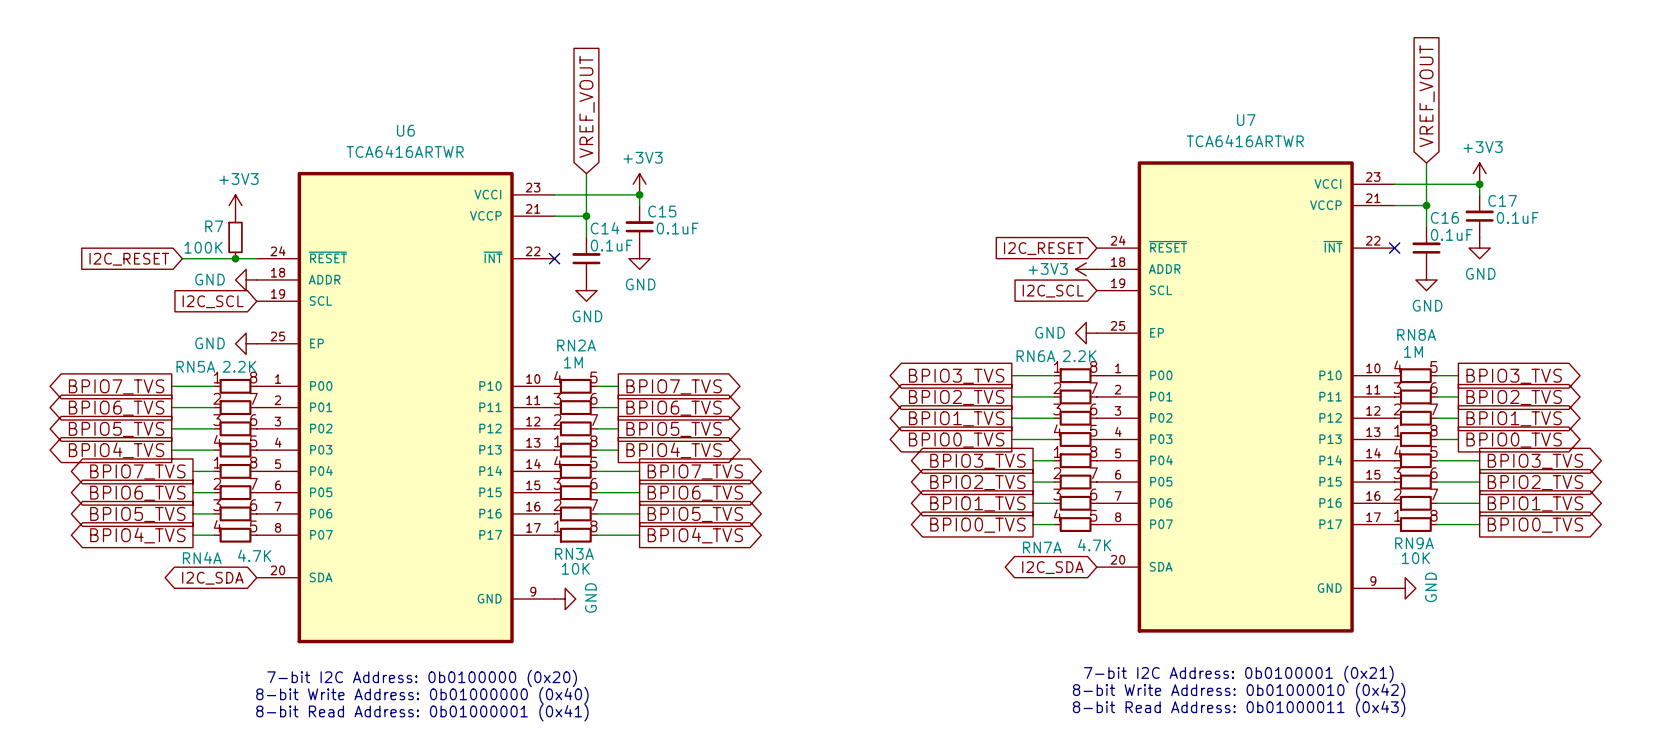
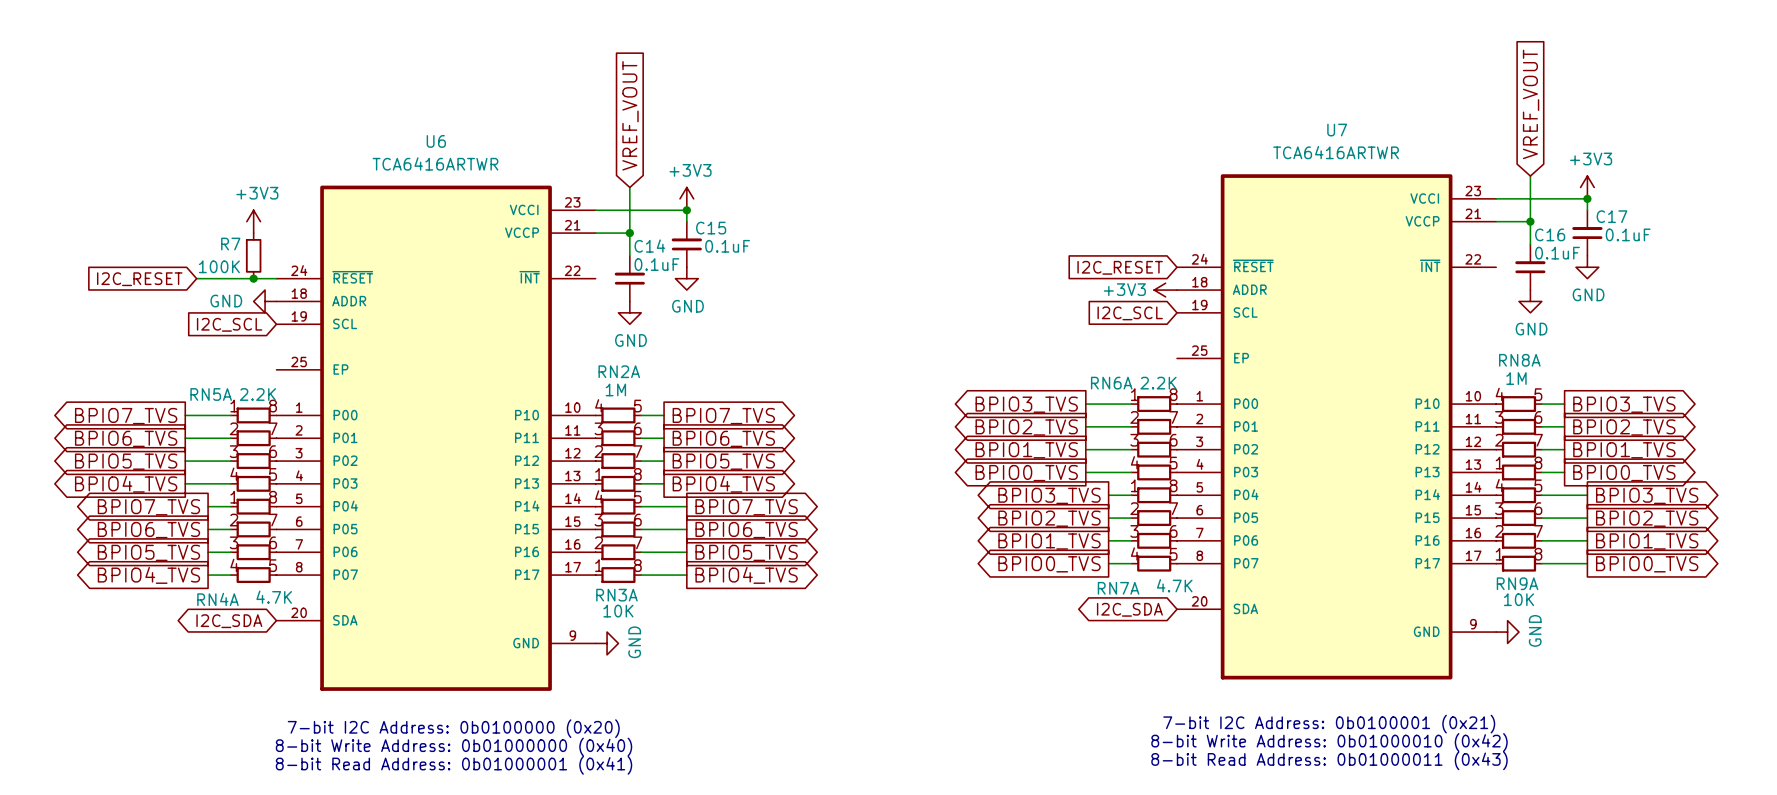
no-connect mark: (1394, 248) -> none
no-connect mark: (554, 258) -> none
power symbol: GND (1086, 333) -> none
power symbol: GND (246, 343) -> none

